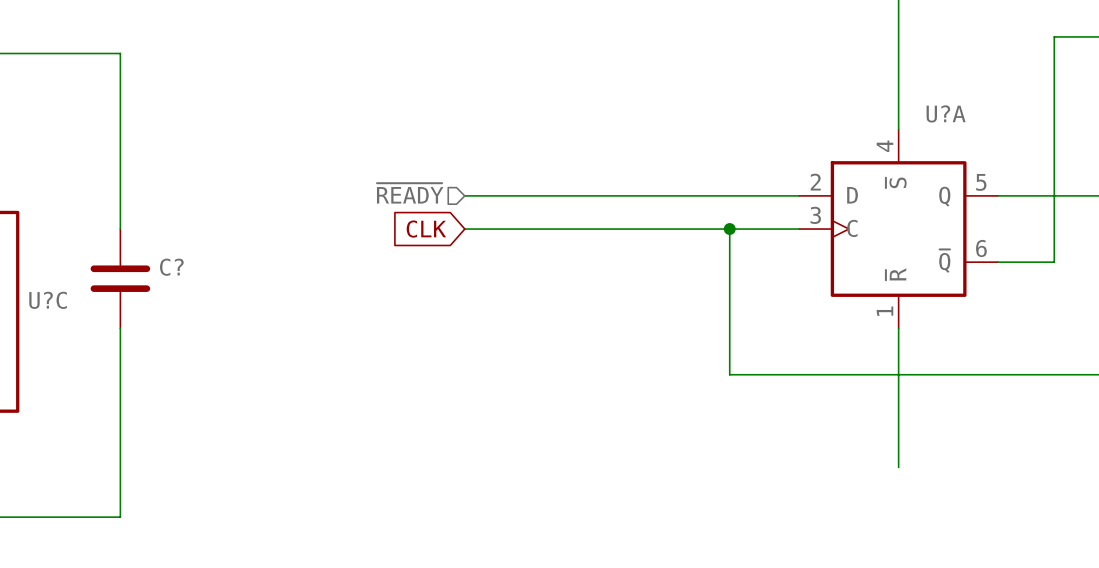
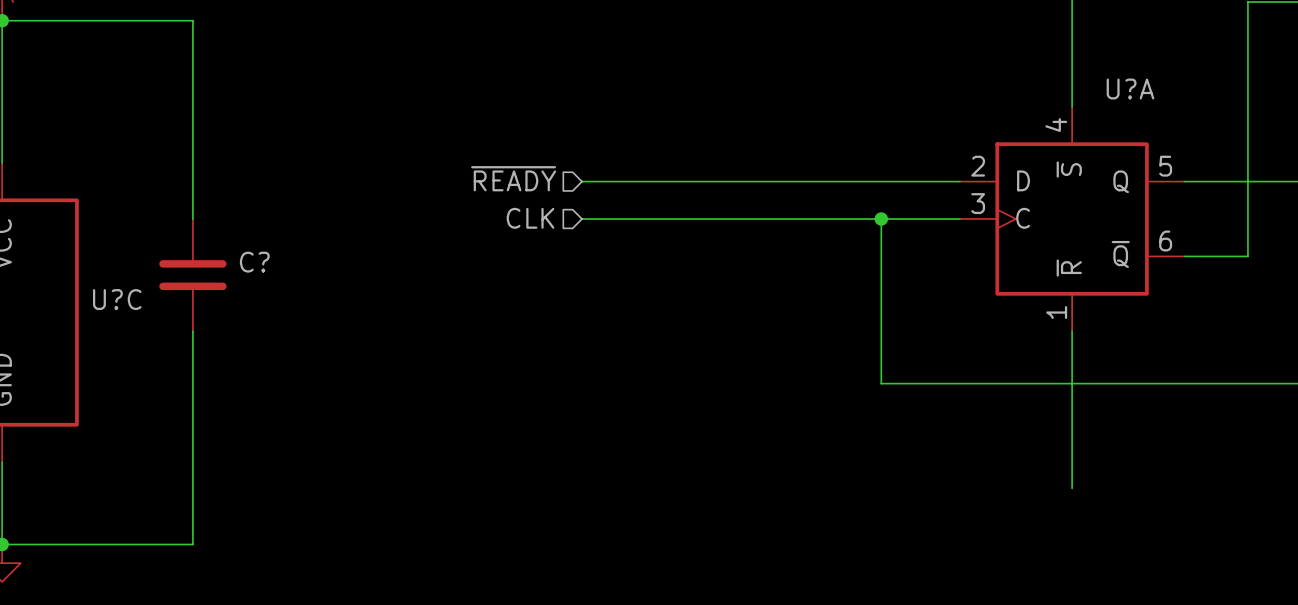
hierarchical label: none -> CLK (530, 218)
global label: CLK (426, 229) -> none

